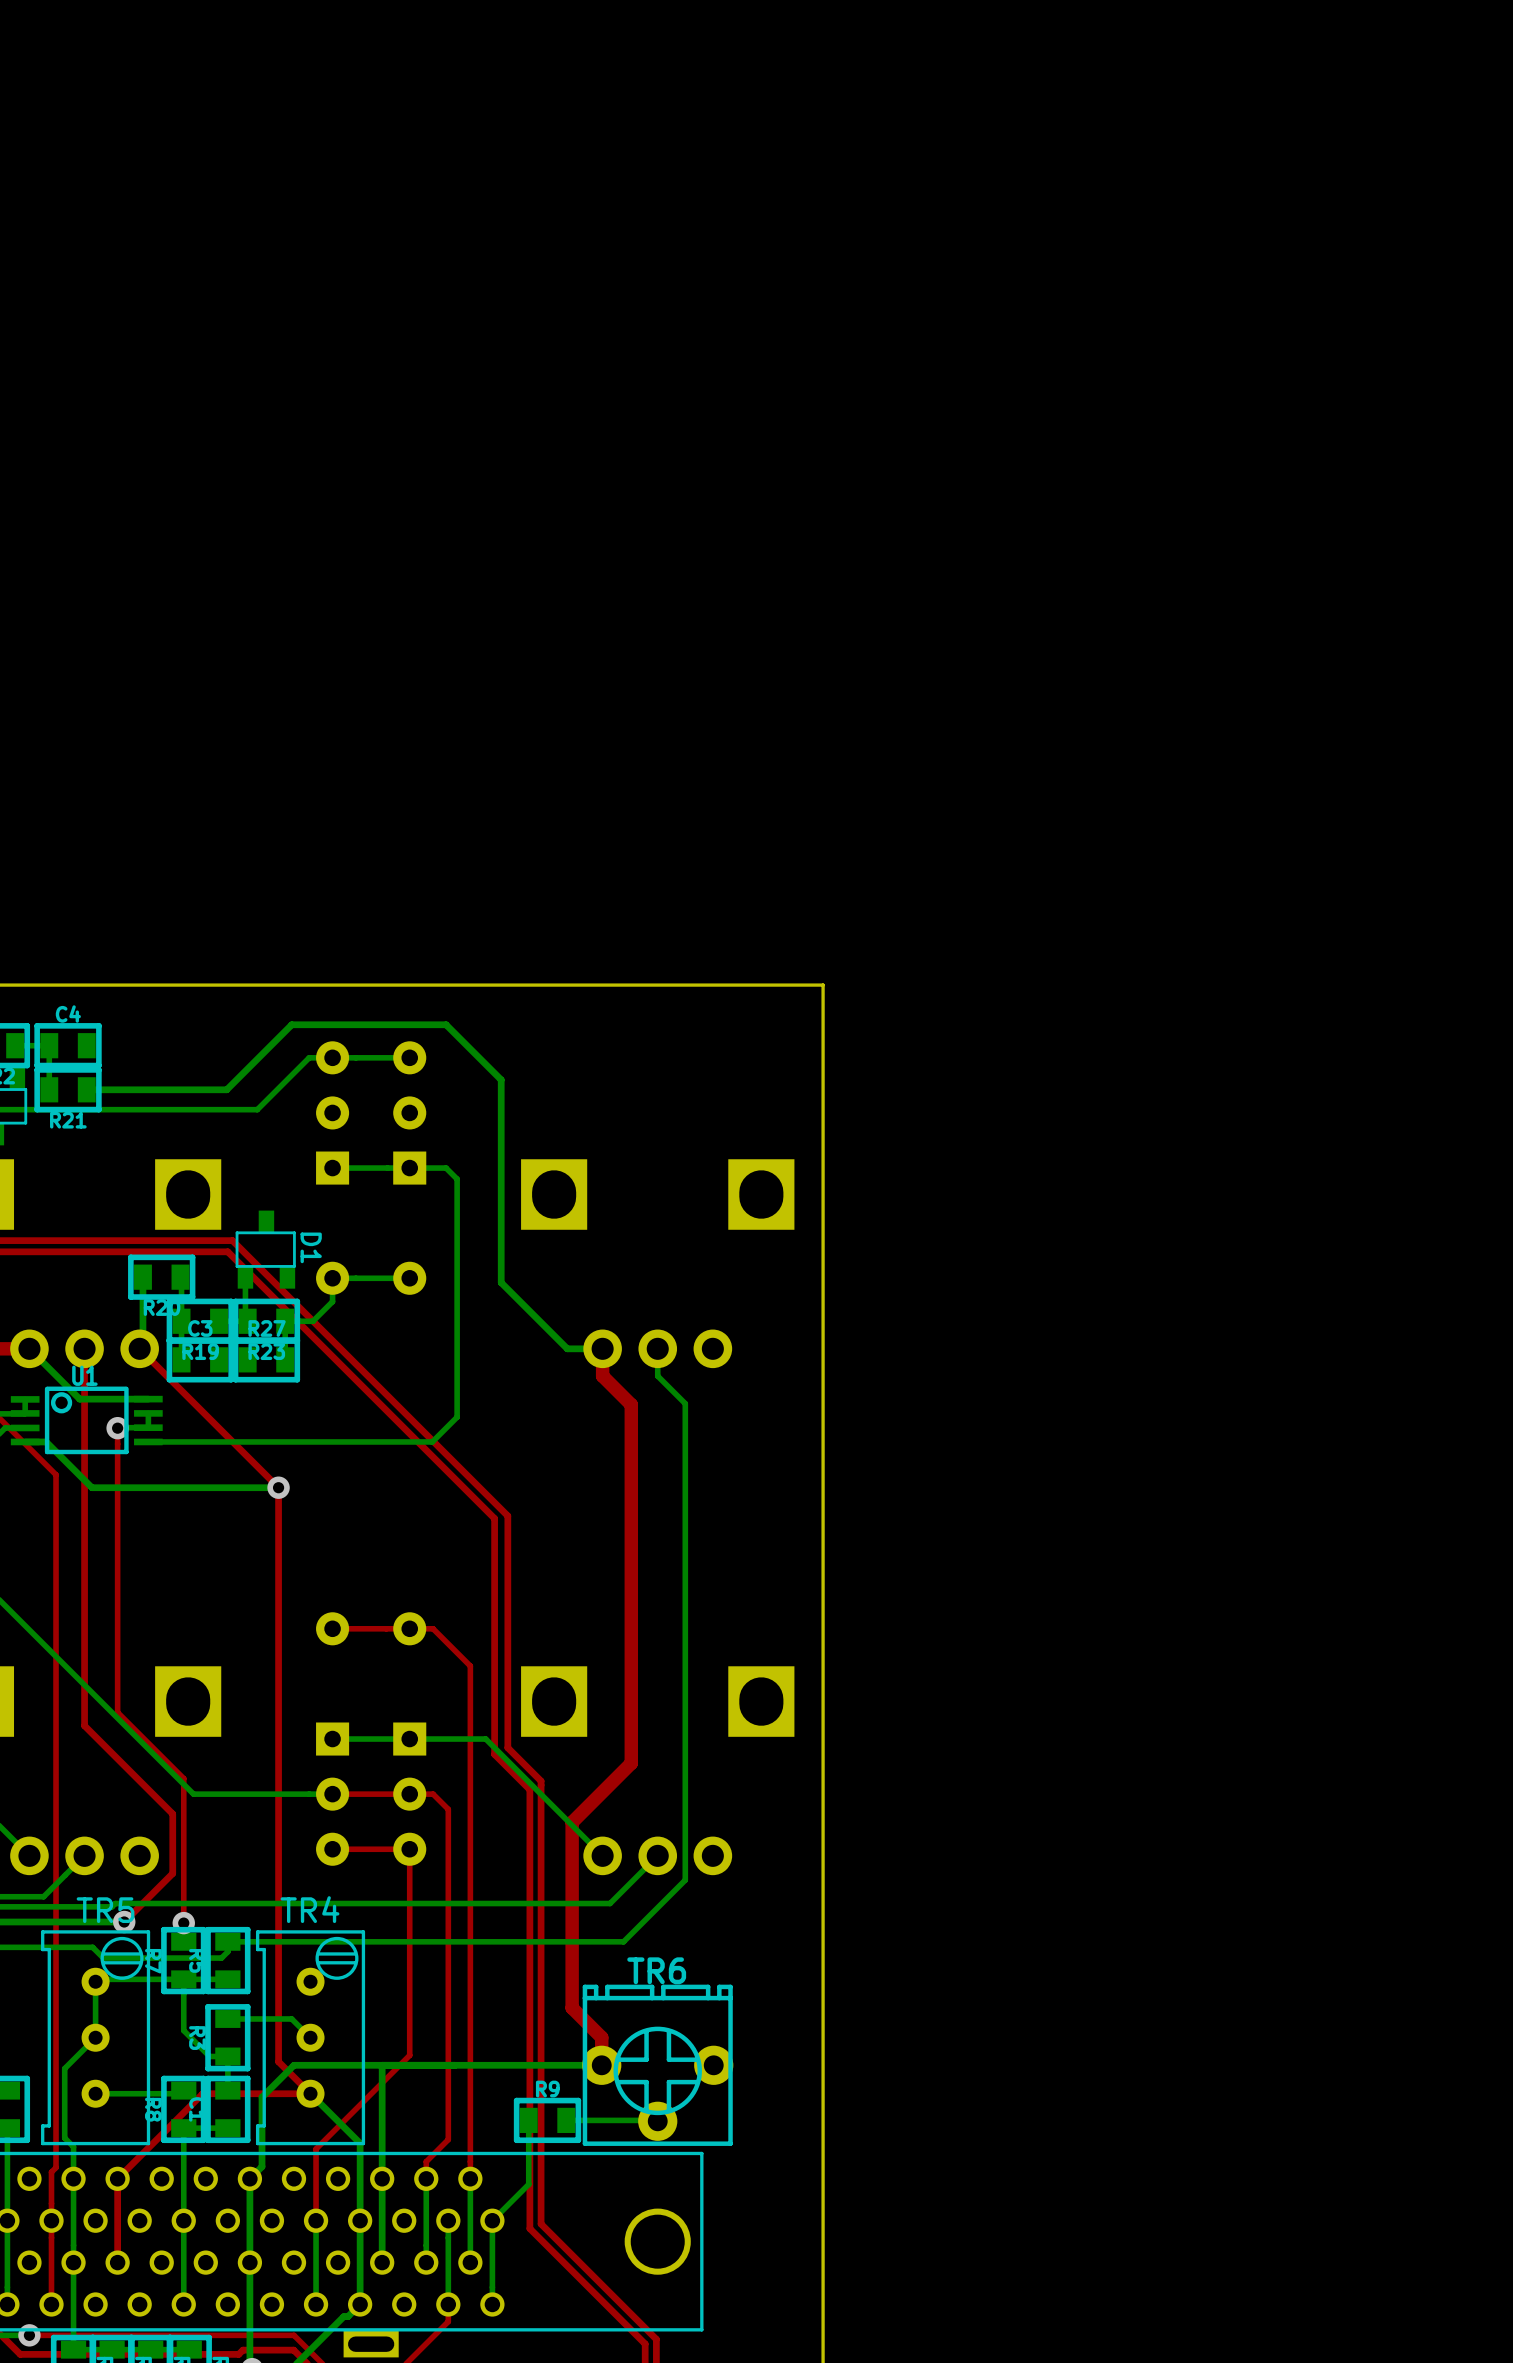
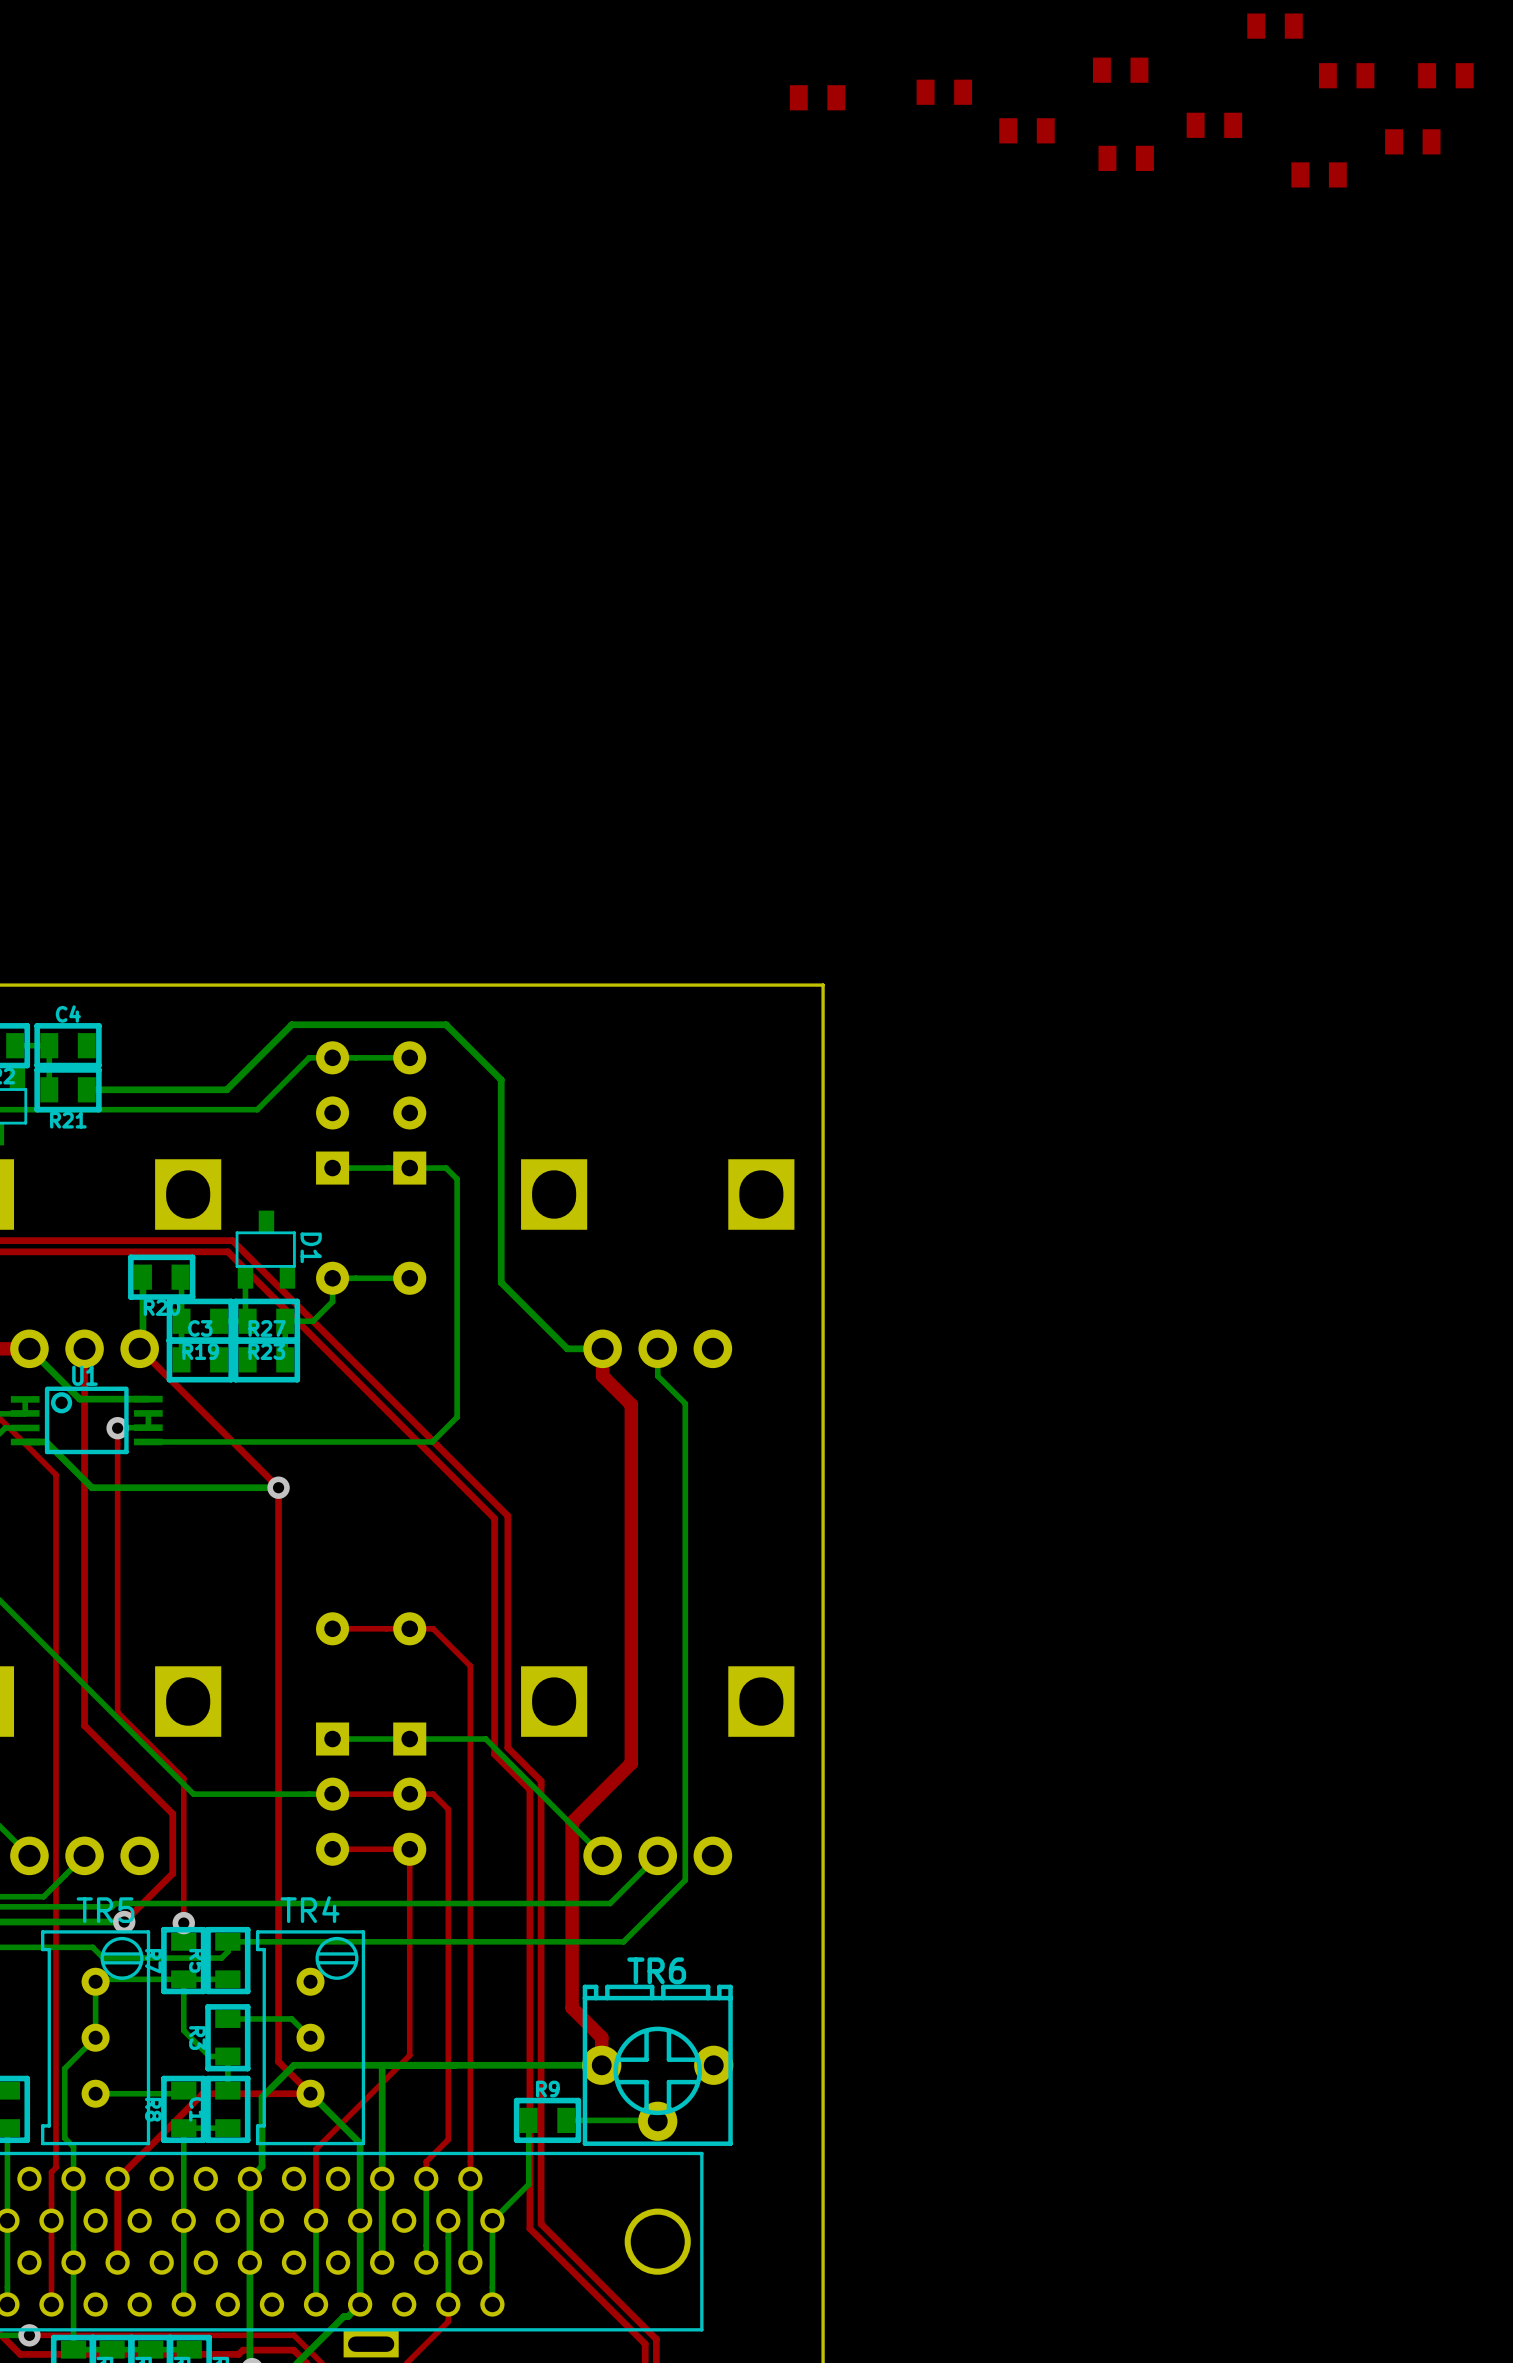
part: none -> (1275, 26)
part: none -> (1120, 70)
part: none -> (1346, 75)
part: none -> (1445, 75)
part: none -> (944, 92)
part: none -> (817, 97)
part: none -> (1214, 125)
part: none -> (1027, 130)
part: none -> (1412, 141)
part: none -> (1126, 158)
part: none -> (1319, 174)

